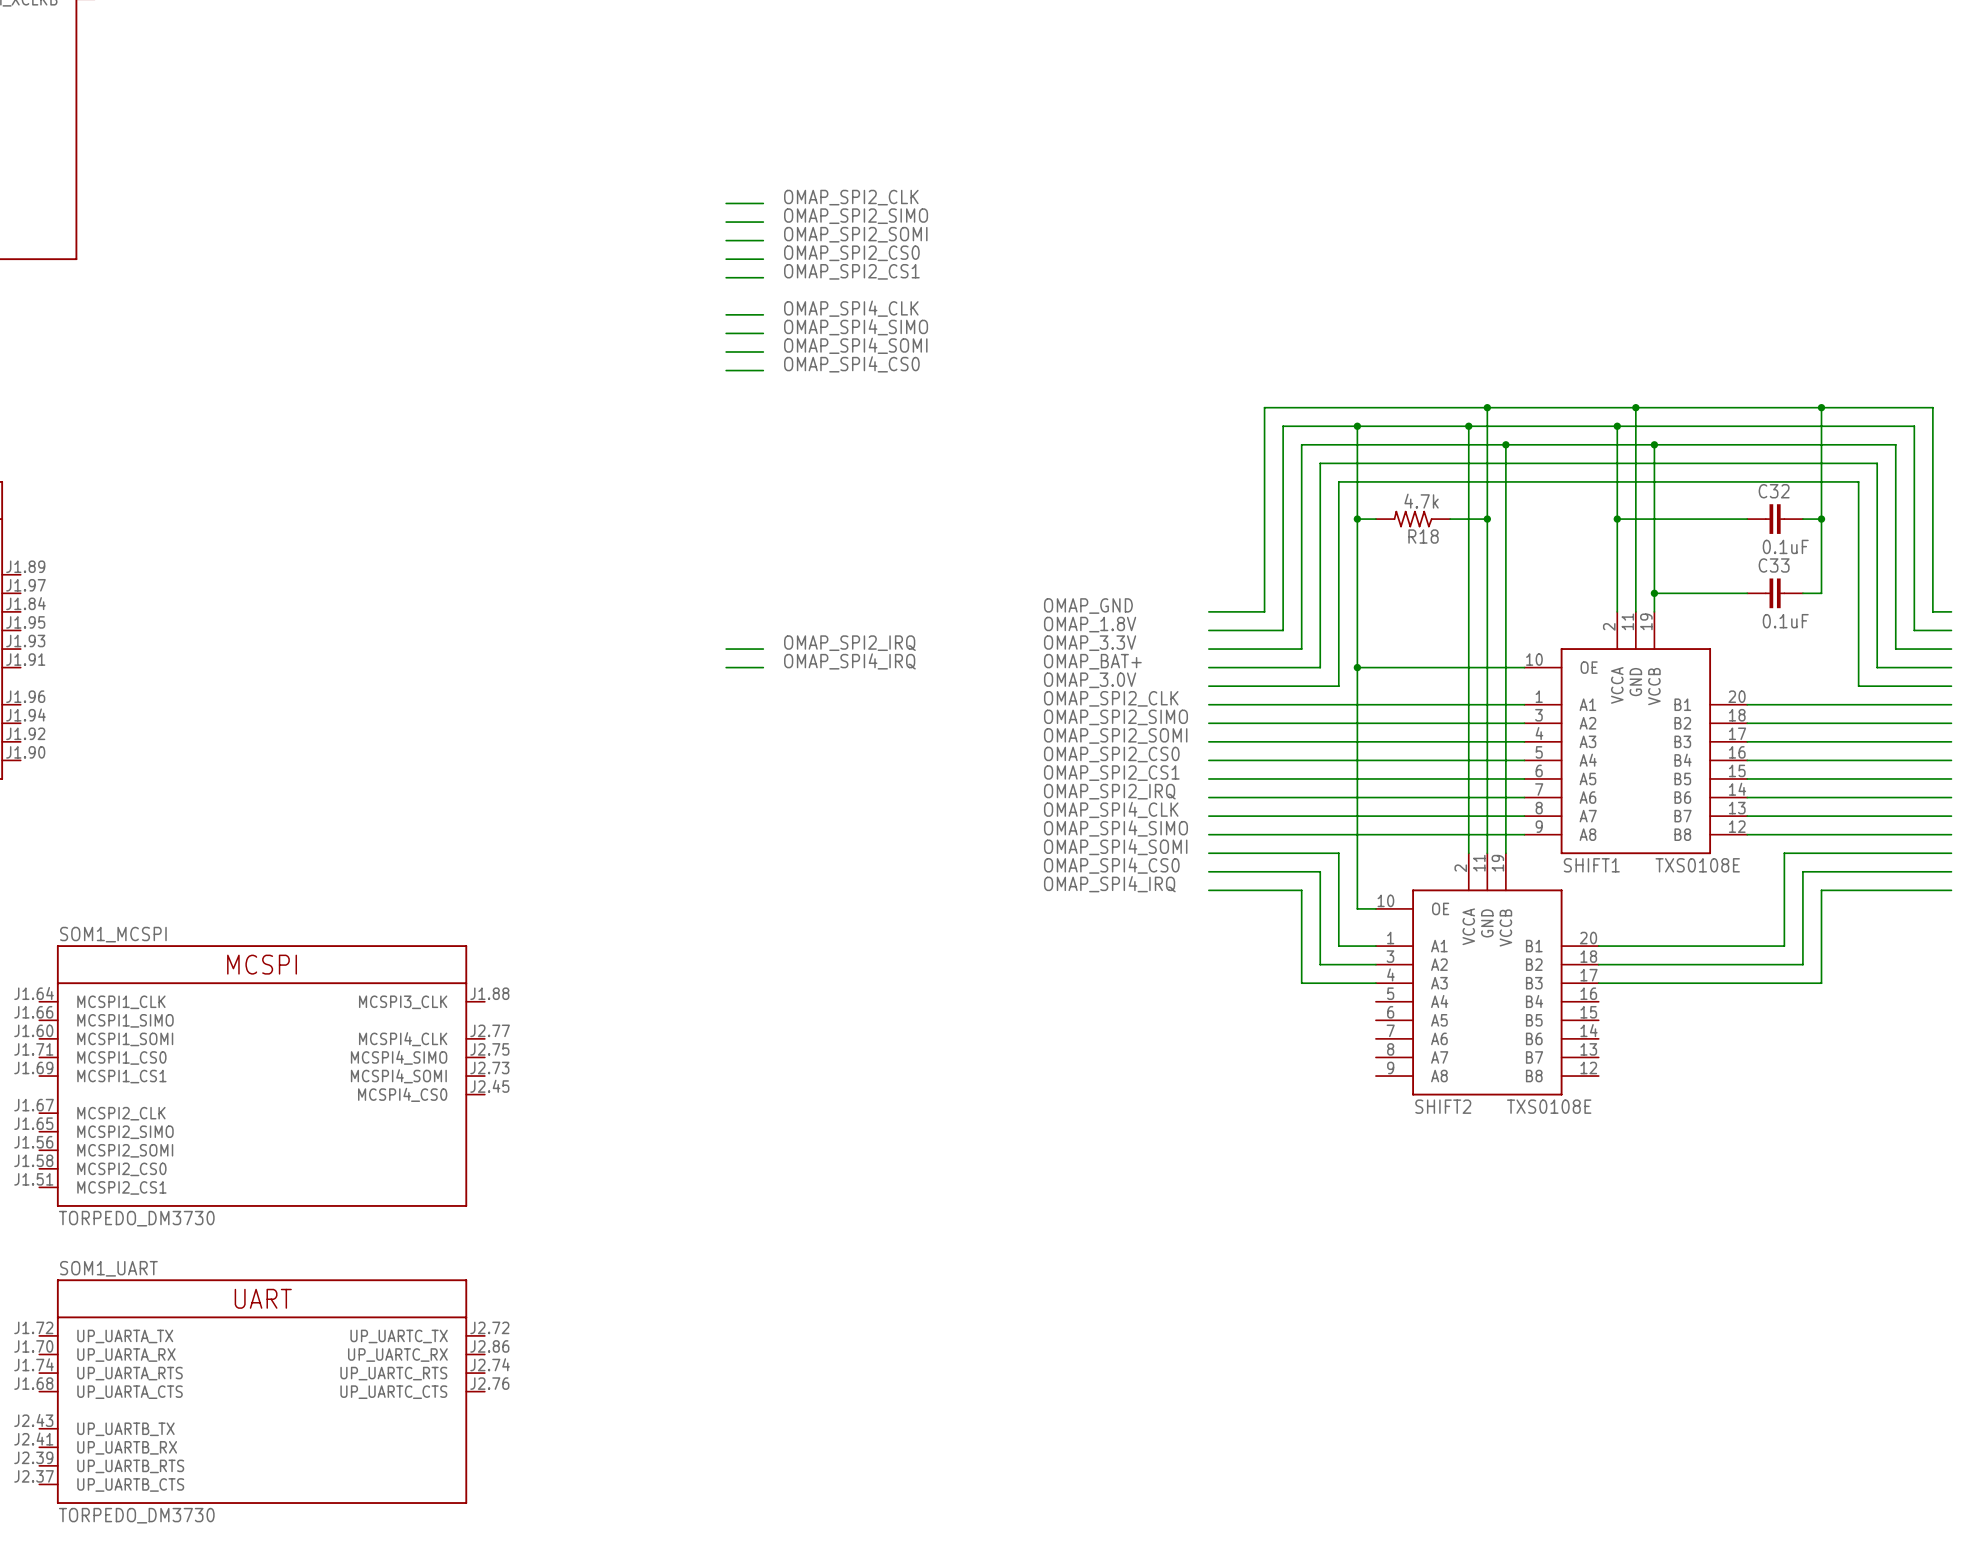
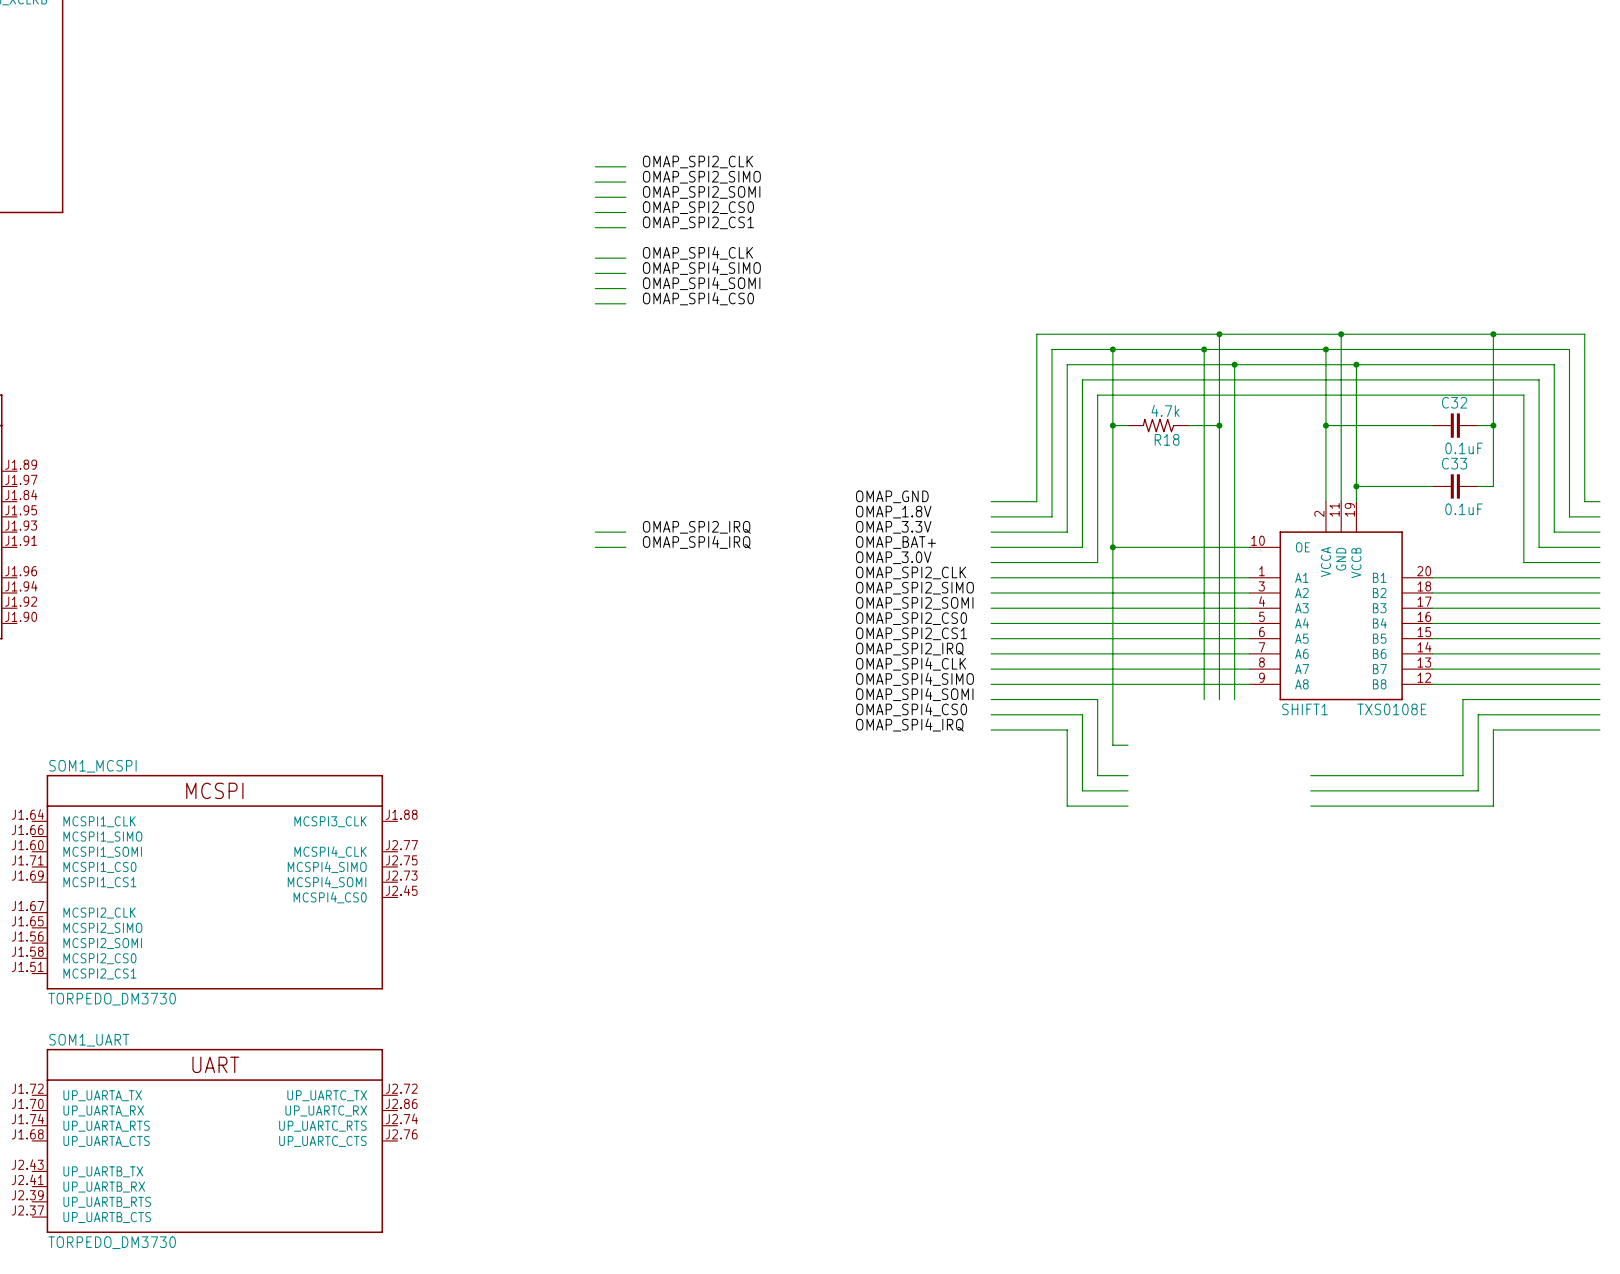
SHIFT2: (1487, 974) -> none

